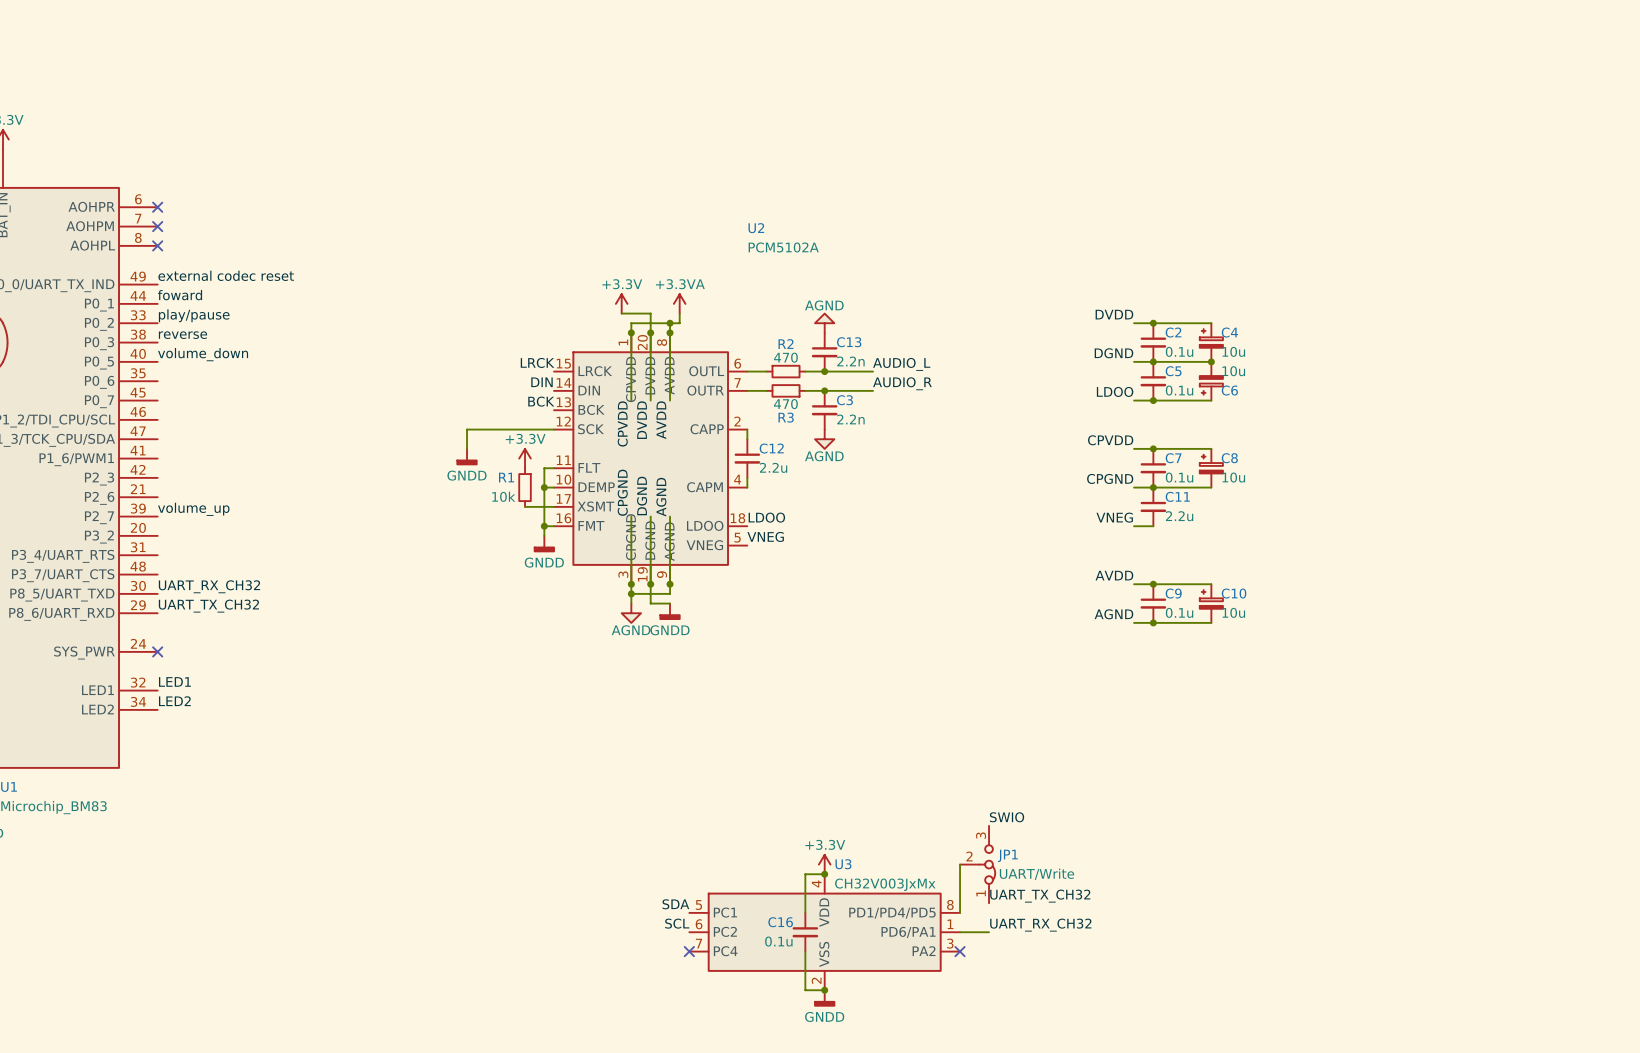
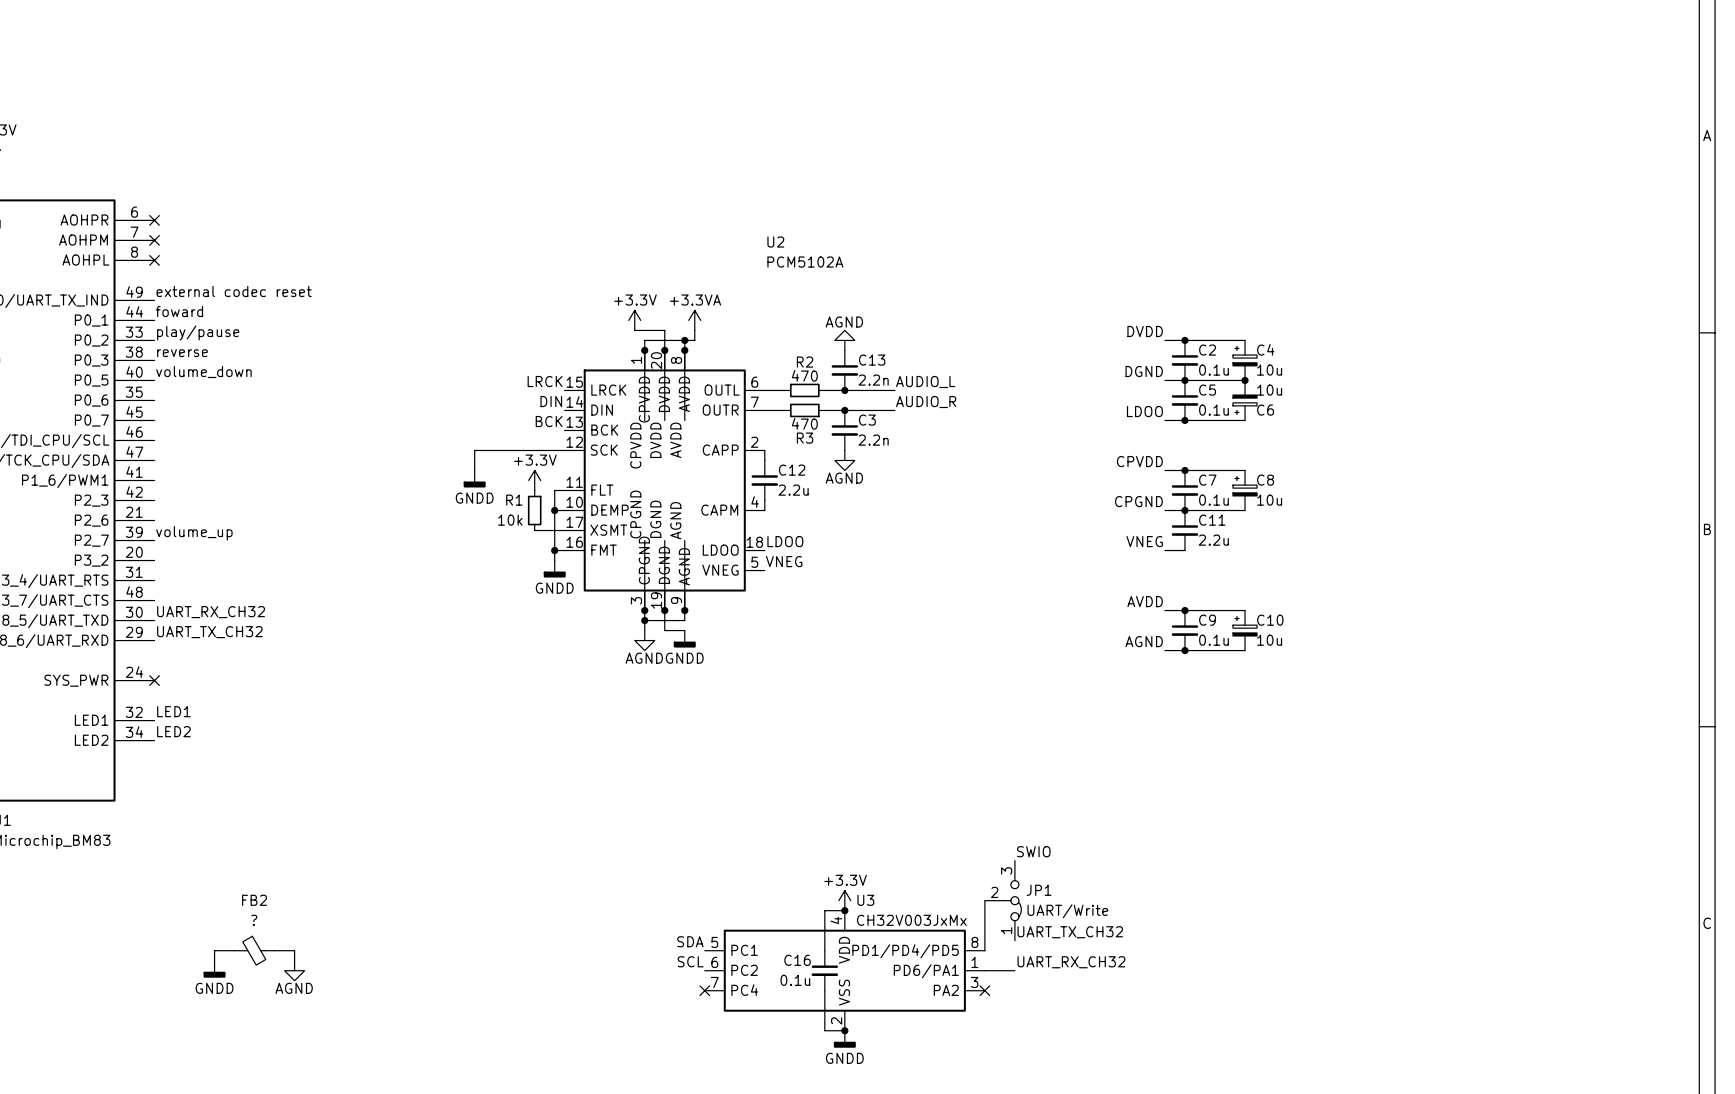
wire: none -> (234, 950) (214, 950) (214, 960)
FB2: none -> ? (254, 950)
wire: none -> (274, 950) (294, 950) (294, 960)
power symbol: none -> GNDD (214, 969)
power symbol: none -> AGND (294, 970)

